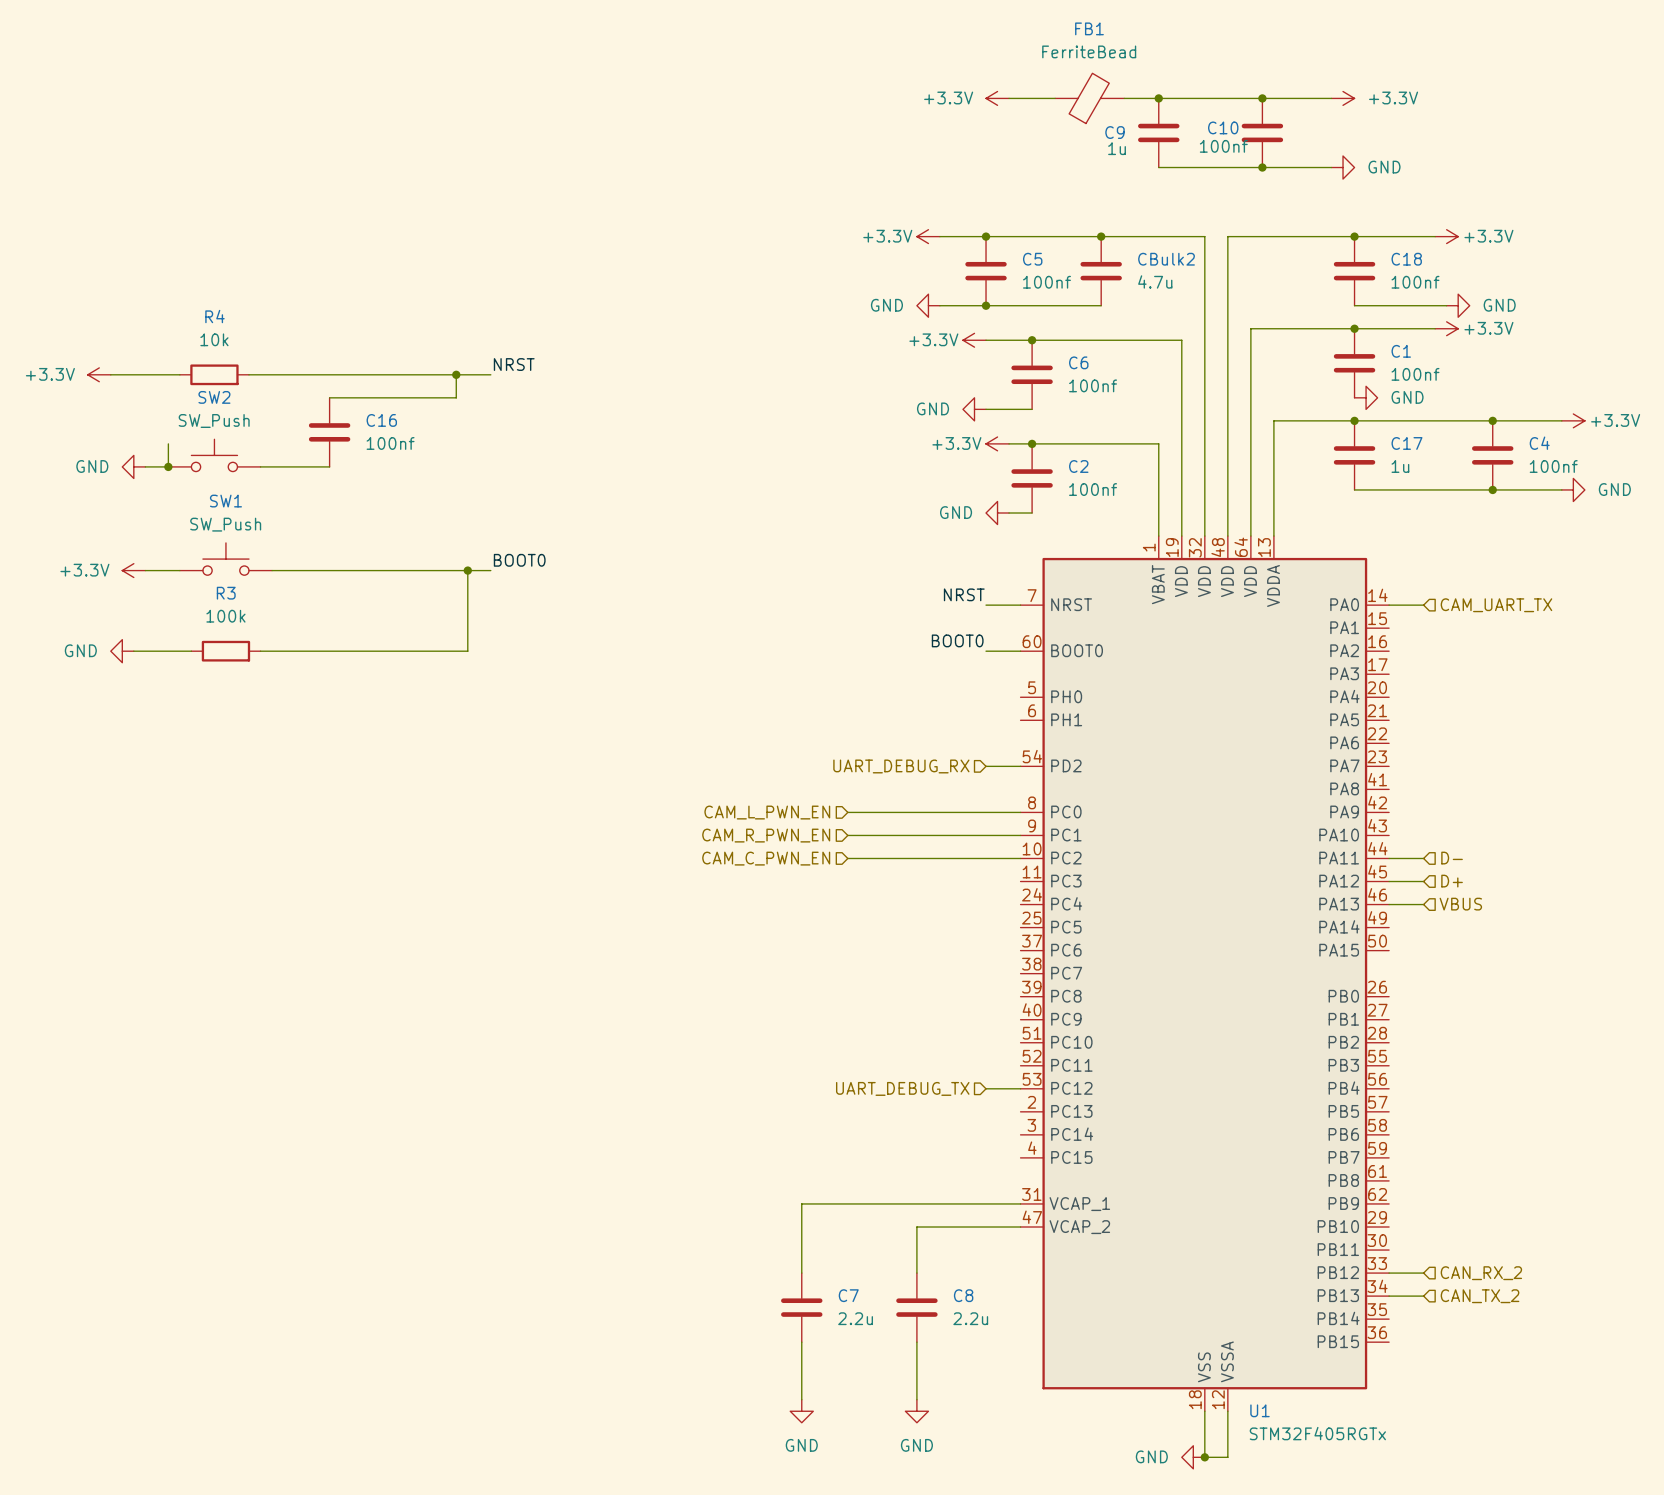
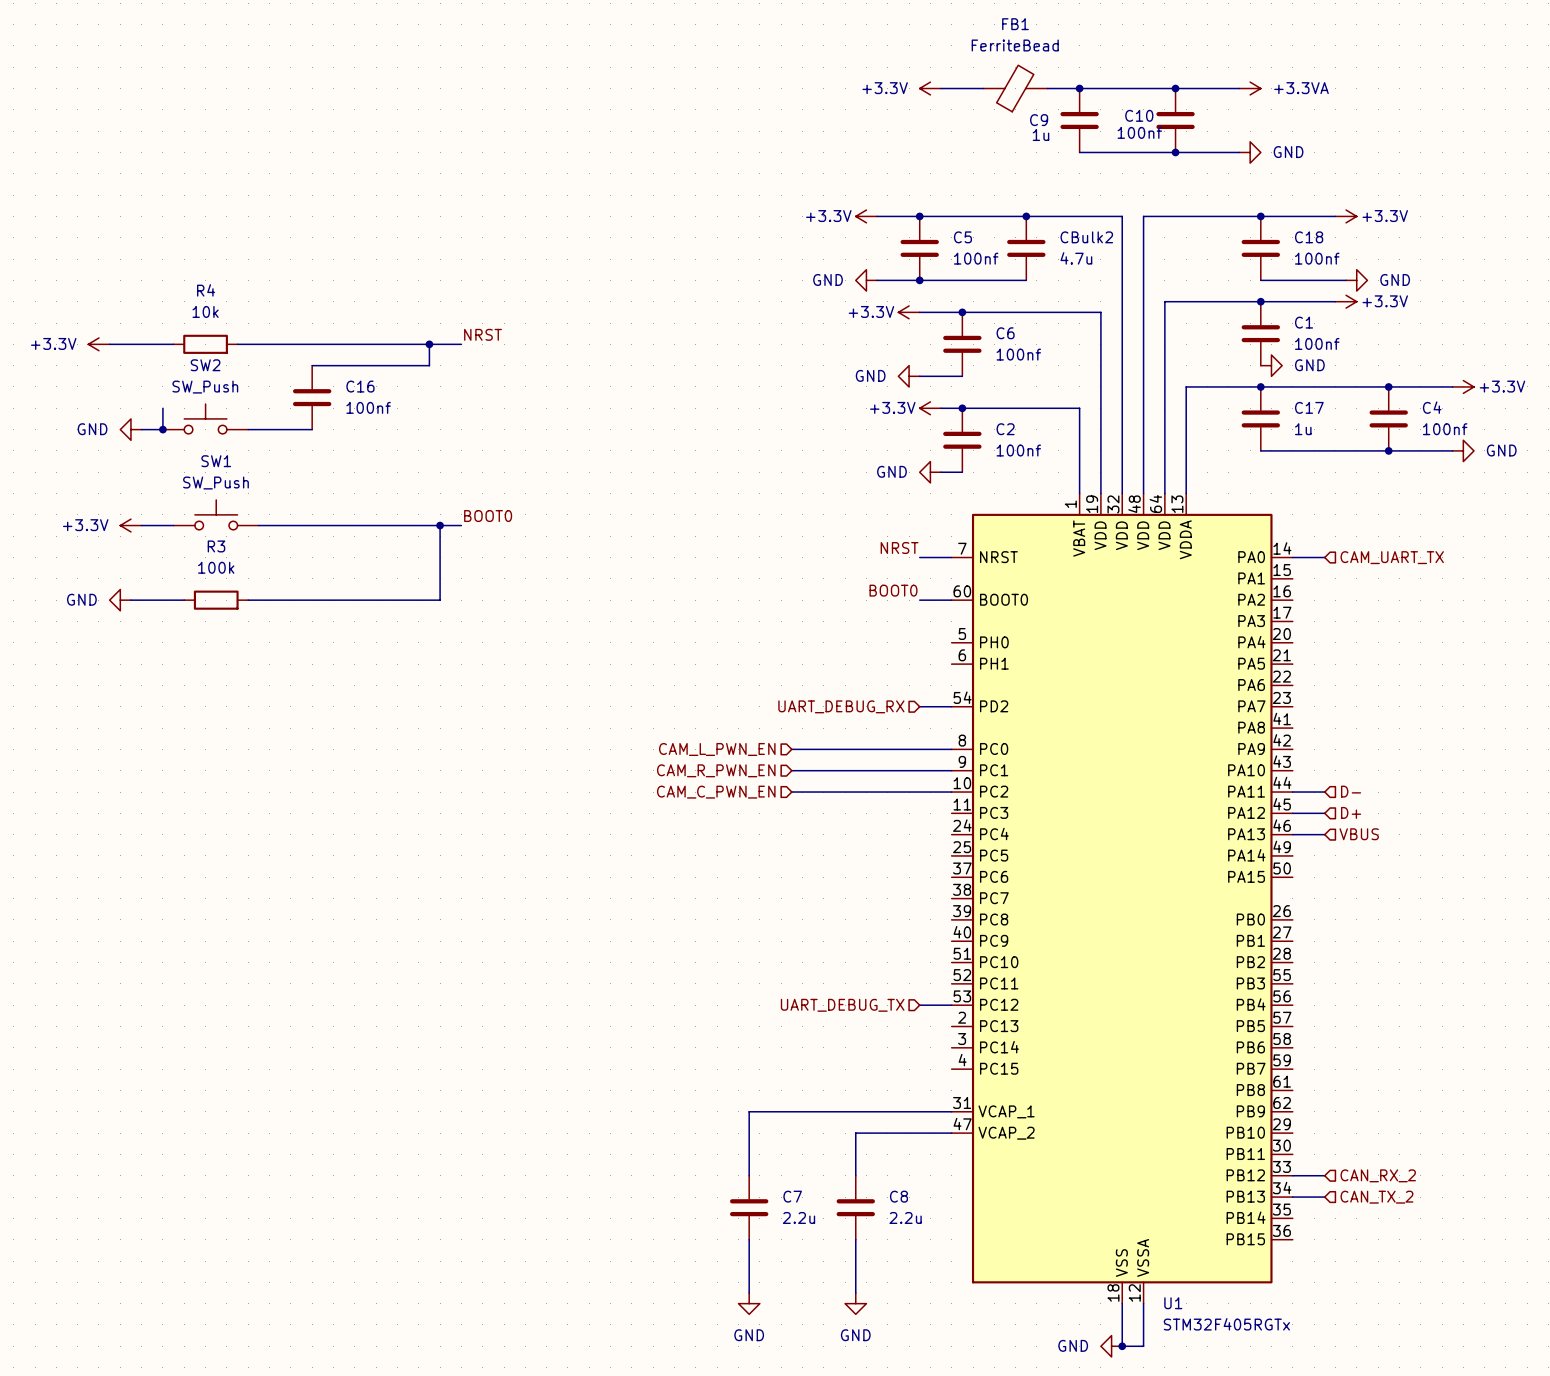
power symbol: +3.3V (1343, 98) -> +3.3VA (1250, 88)

